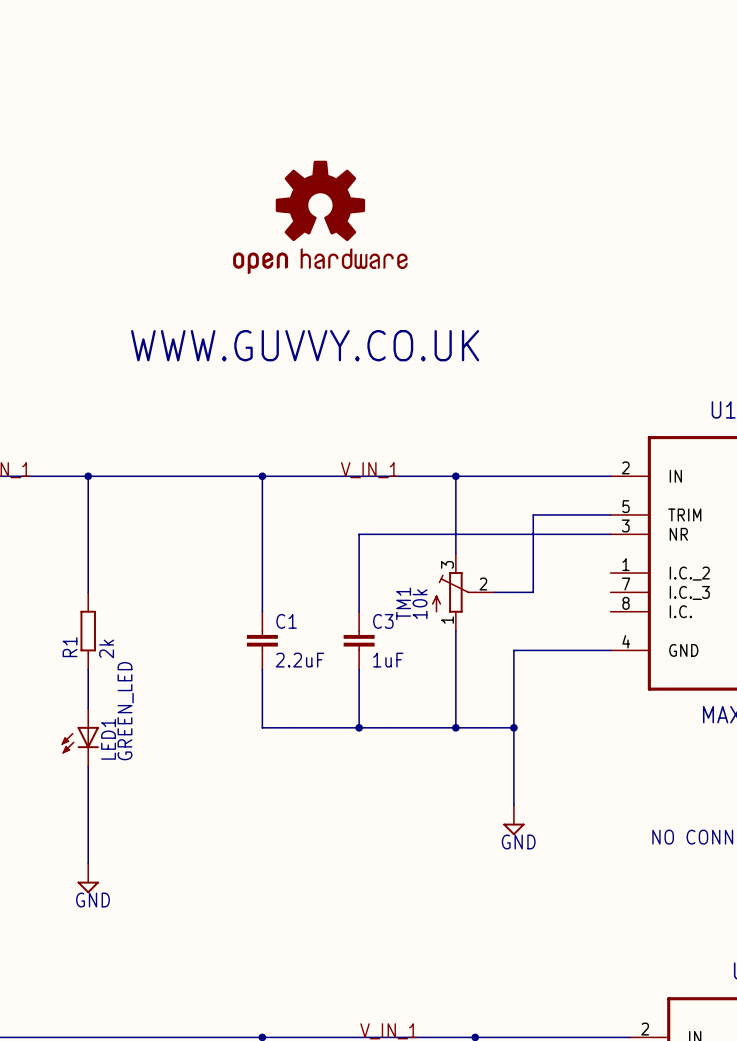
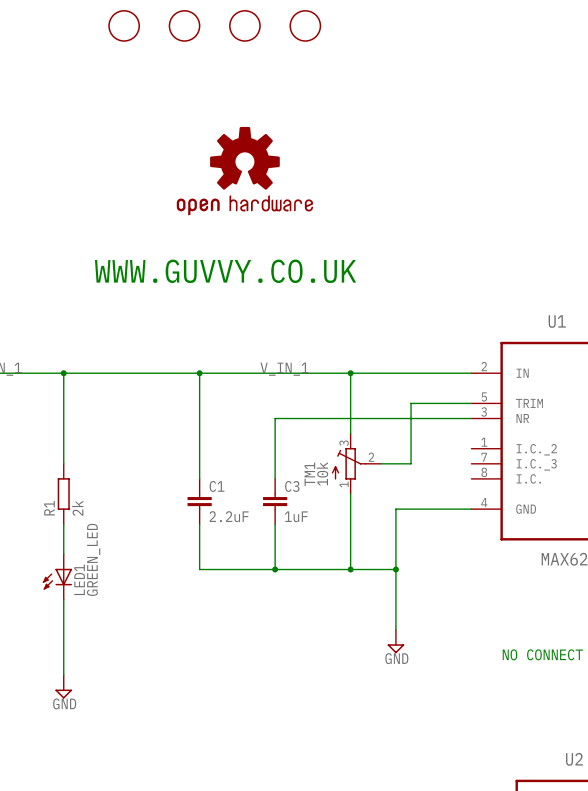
part: none -> (124, 25)
part: none -> (184, 25)
part: none -> (244, 25)
part: none -> (305, 25)

